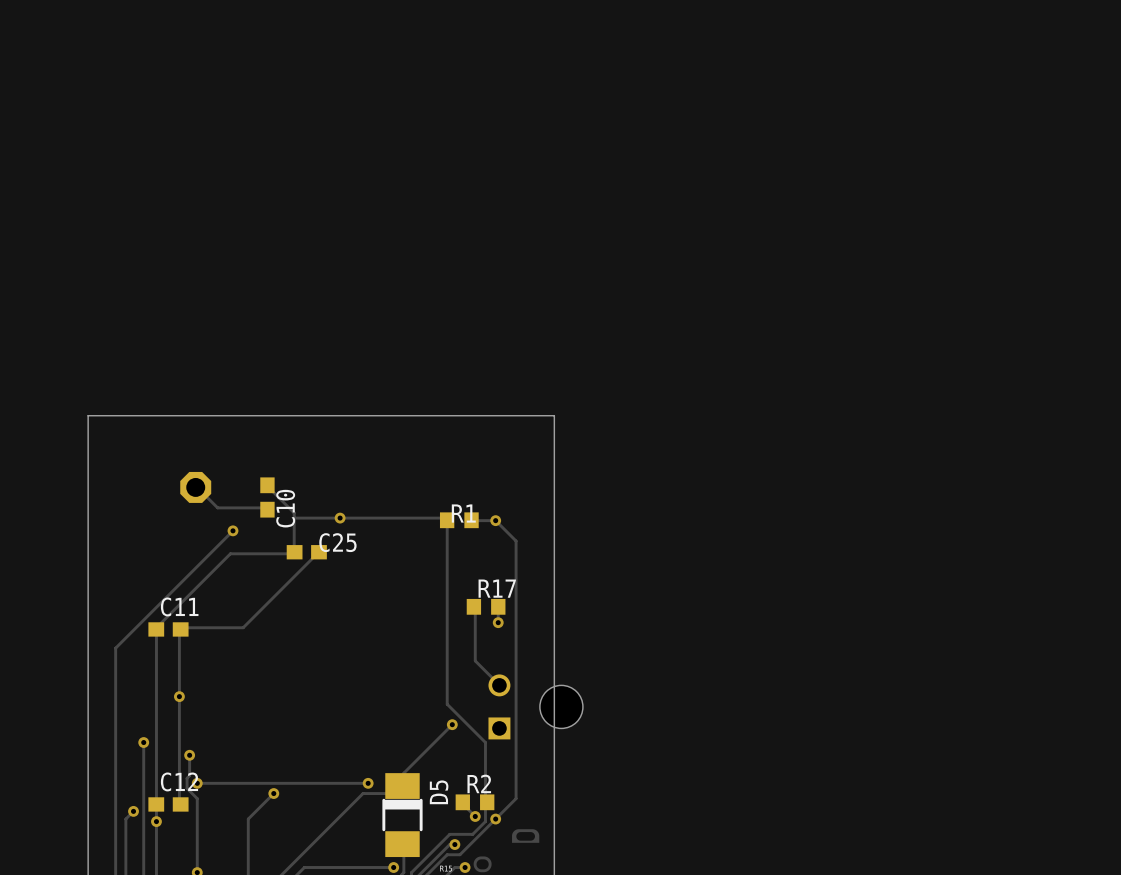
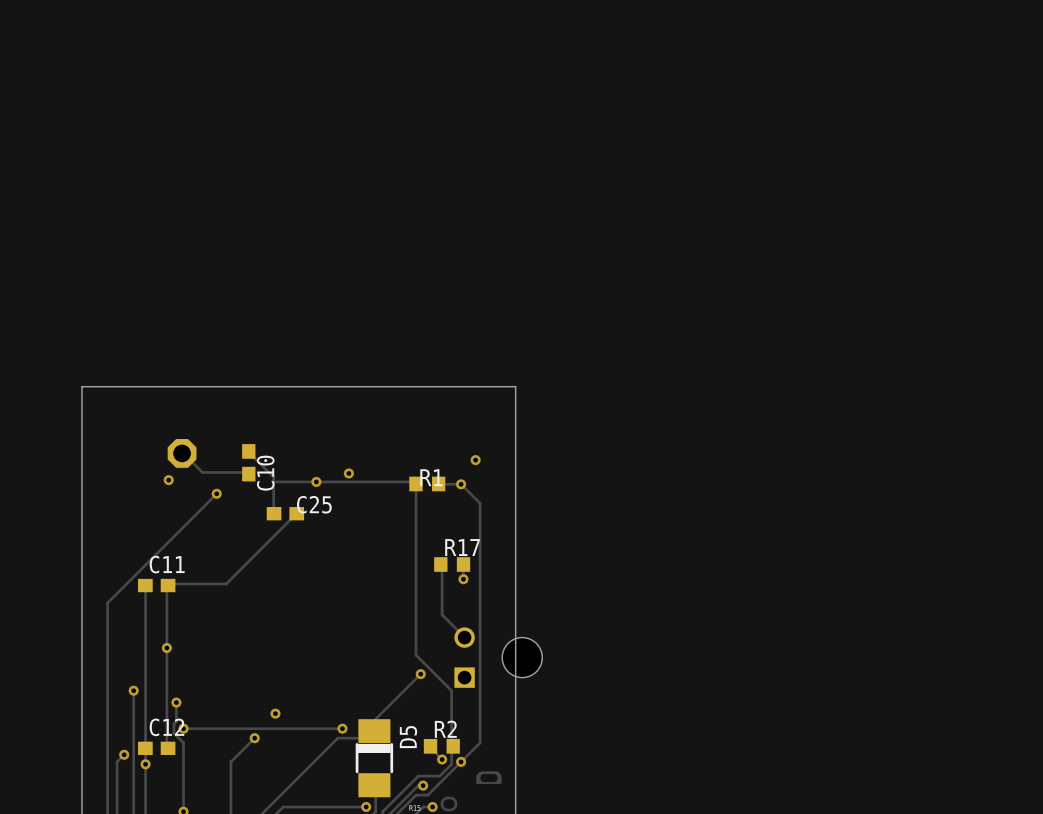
via: none -> (475, 460)
via: none -> (348, 473)
via: none -> (168, 480)
track: (294, 553) (230, 553) (156, 627) -> none
via: none -> (275, 713)

